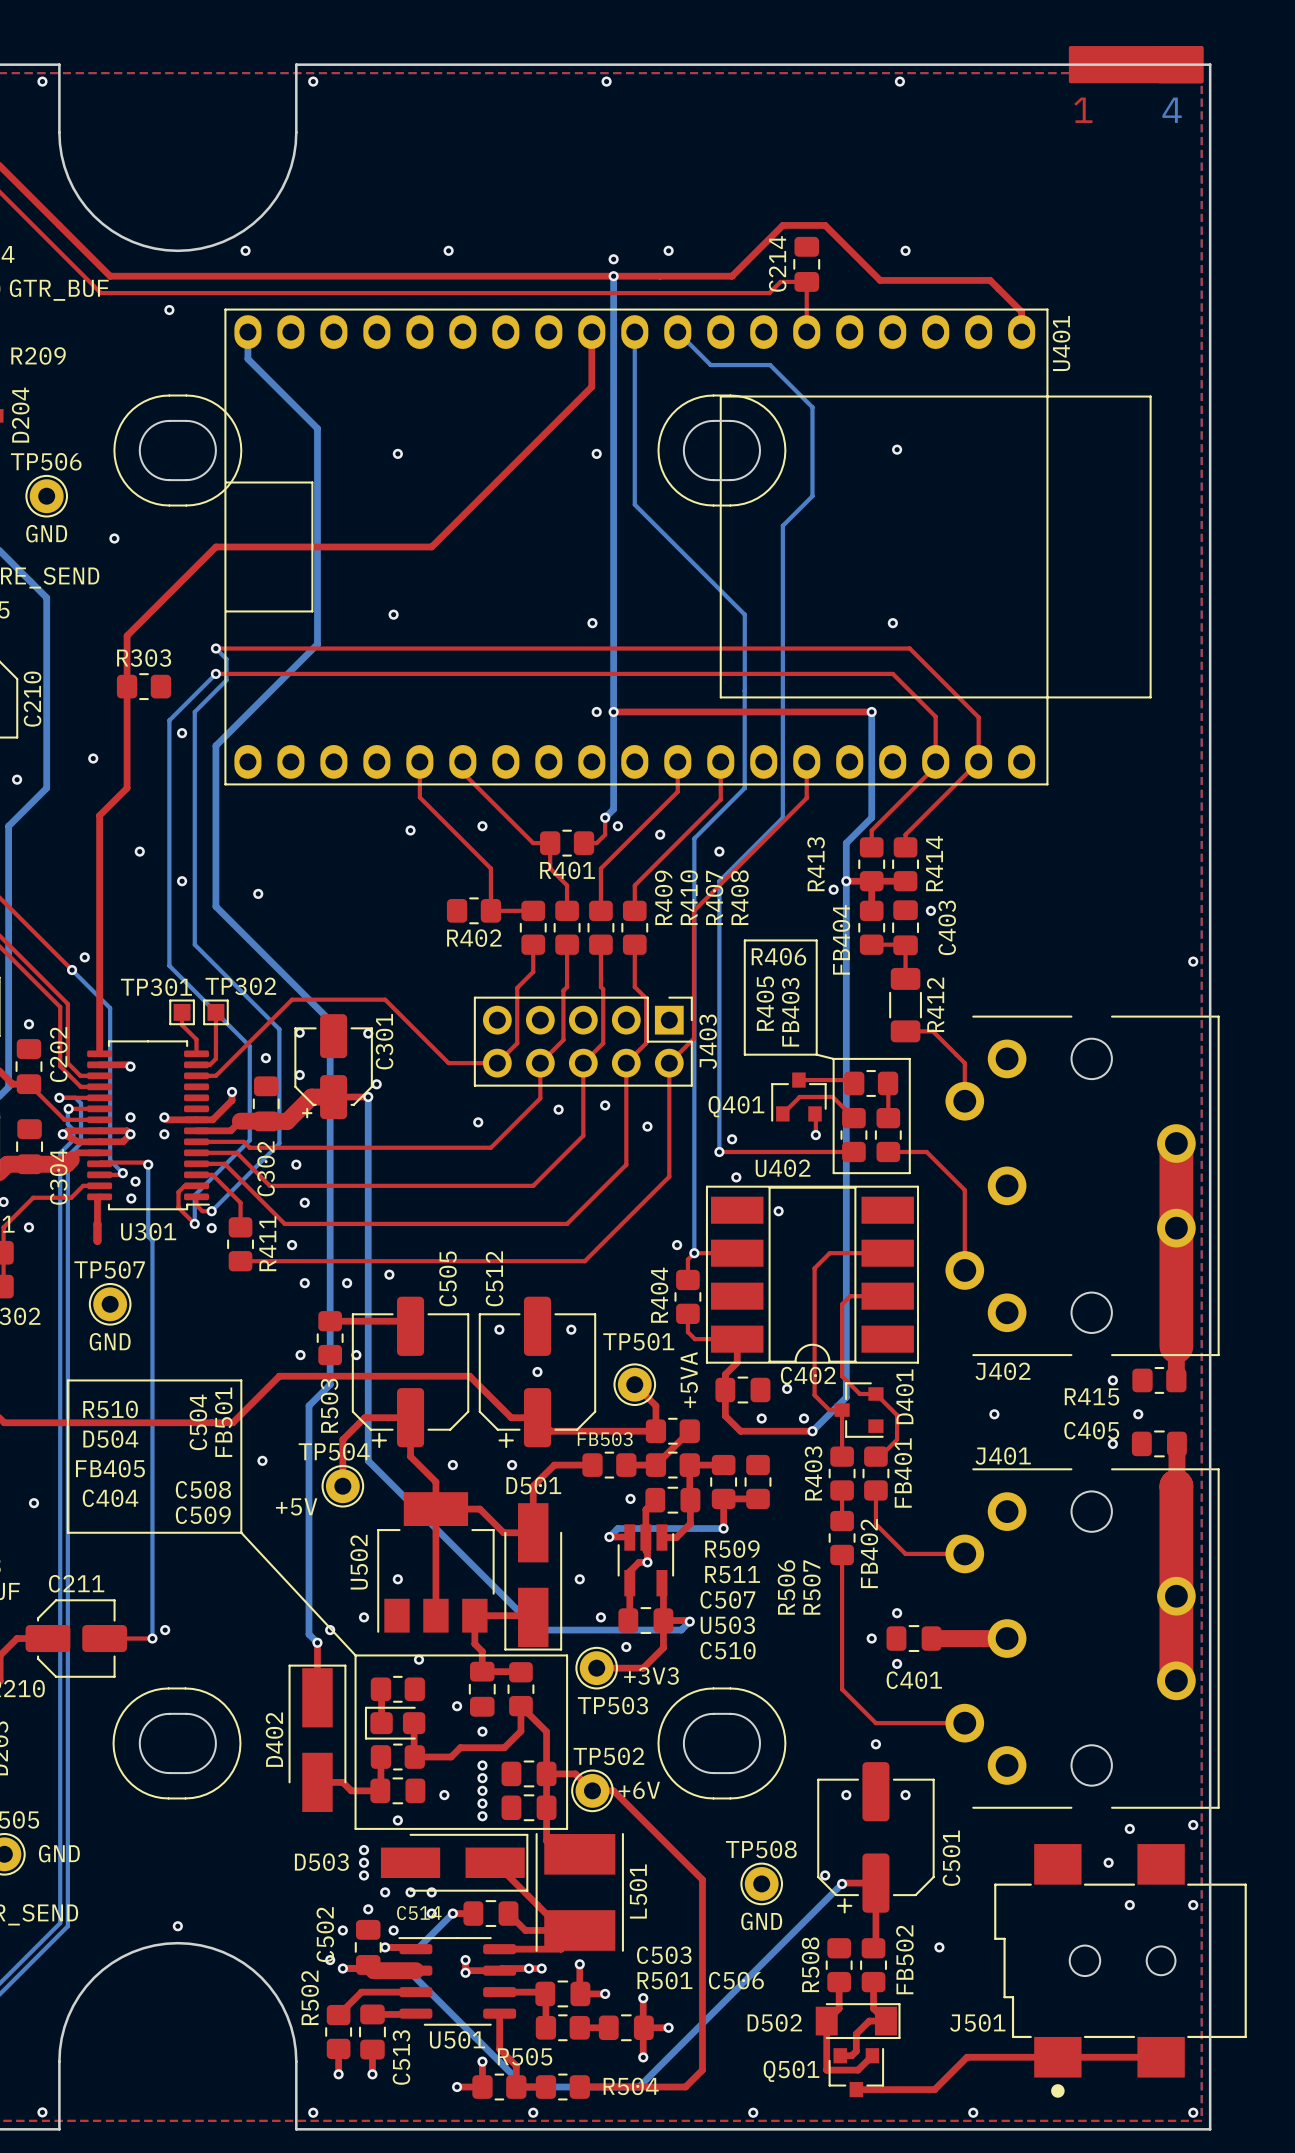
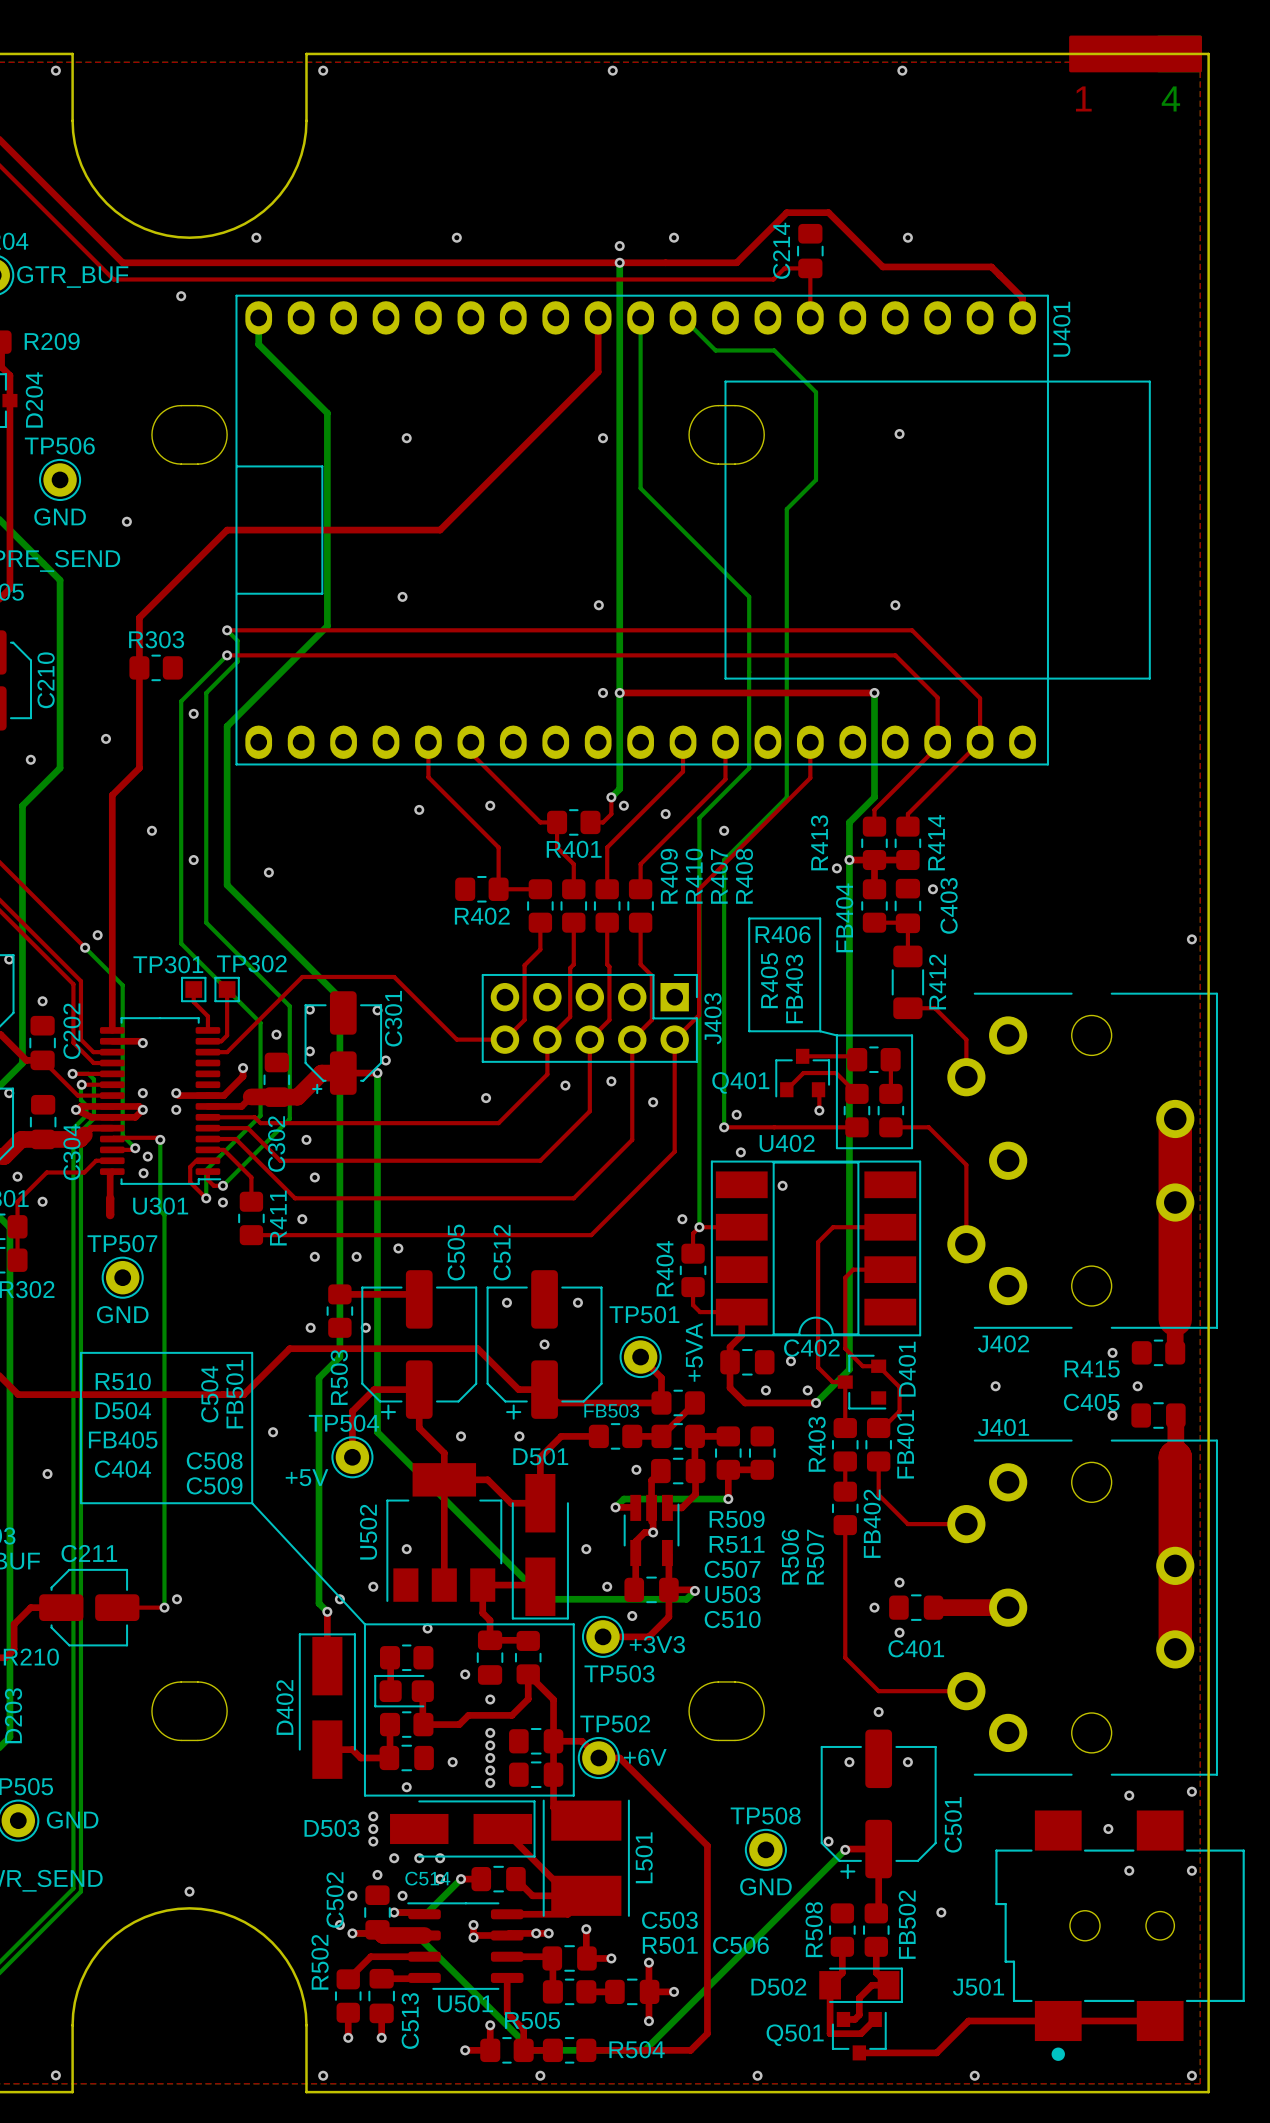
line: (169, 395) (192, 395) (211, 401) (227, 414) (235, 424) (239, 437) (240, 457) (235, 476) (227, 486) (217, 495) (199, 503) (162, 505) (143, 499) (128, 486) (120, 476) (115, 463) (114, 450) (115, 437) (120, 424) (128, 414) (138, 405) (149, 399) (169, 395) -> none
line: (713, 395) (737, 395) (757, 402) (774, 417) (783, 436) (784, 457) (778, 478) (763, 494) (744, 503) (706, 505) (687, 499) (677, 491) (668, 481) (660, 463) (658, 450) (660, 437) (664, 424) (672, 414) (682, 405) (693, 399) (713, 395) -> none
line: (168, 1688) (192, 1688) (212, 1695) (229, 1709) (238, 1729) (240, 1750) (233, 1770) (218, 1787) (199, 1796) (161, 1798) (142, 1792) (127, 1779) (119, 1769) (115, 1756) (113, 1743) (115, 1730) (119, 1717) (127, 1706) (137, 1698) (149, 1692) (168, 1688) -> none
line: (713, 1688) (737, 1688) (755, 1694) (771, 1706) (779, 1717) (783, 1730) (785, 1743) (783, 1756) (775, 1774) (761, 1788) (743, 1796) (706, 1798) (687, 1792) (672, 1779) (664, 1769) (660, 1756) (658, 1743) (660, 1730) (664, 1717) (672, 1706) (682, 1698) (693, 1692) (713, 1688) -> none

